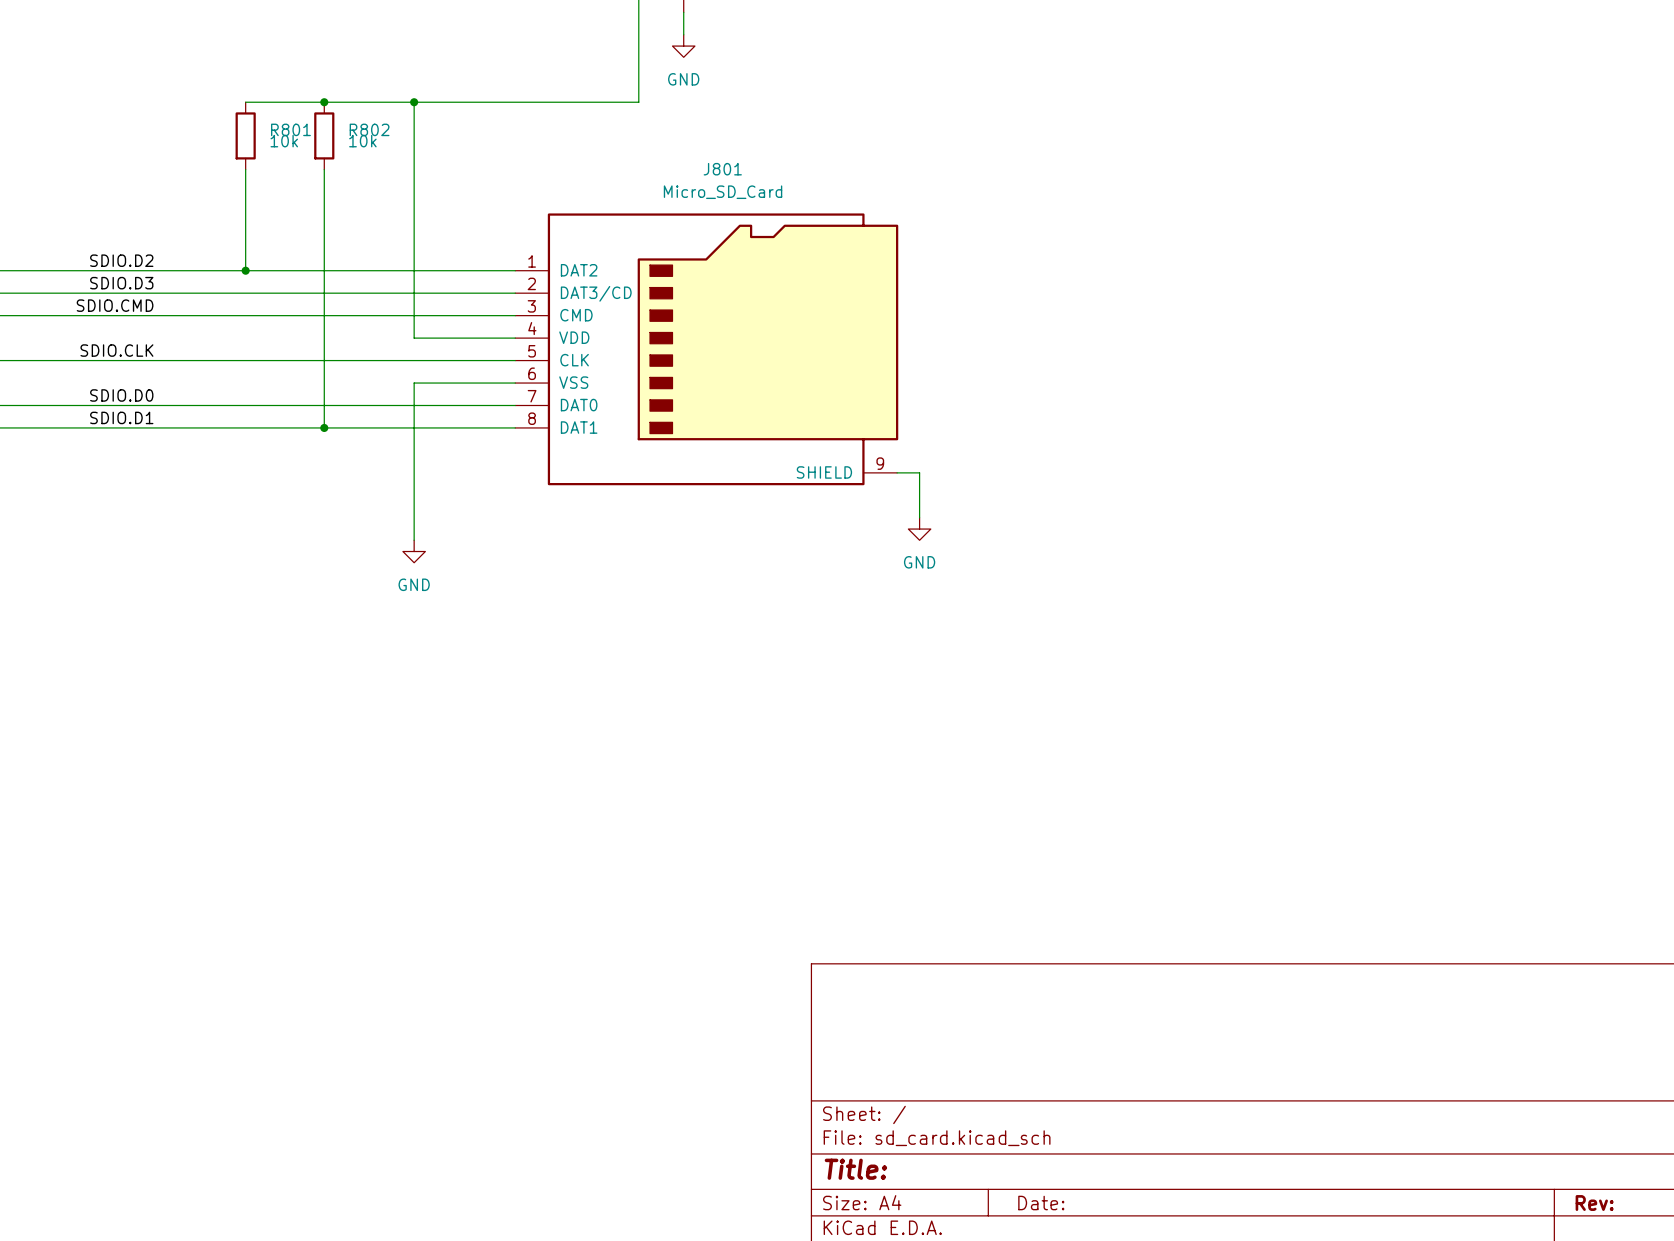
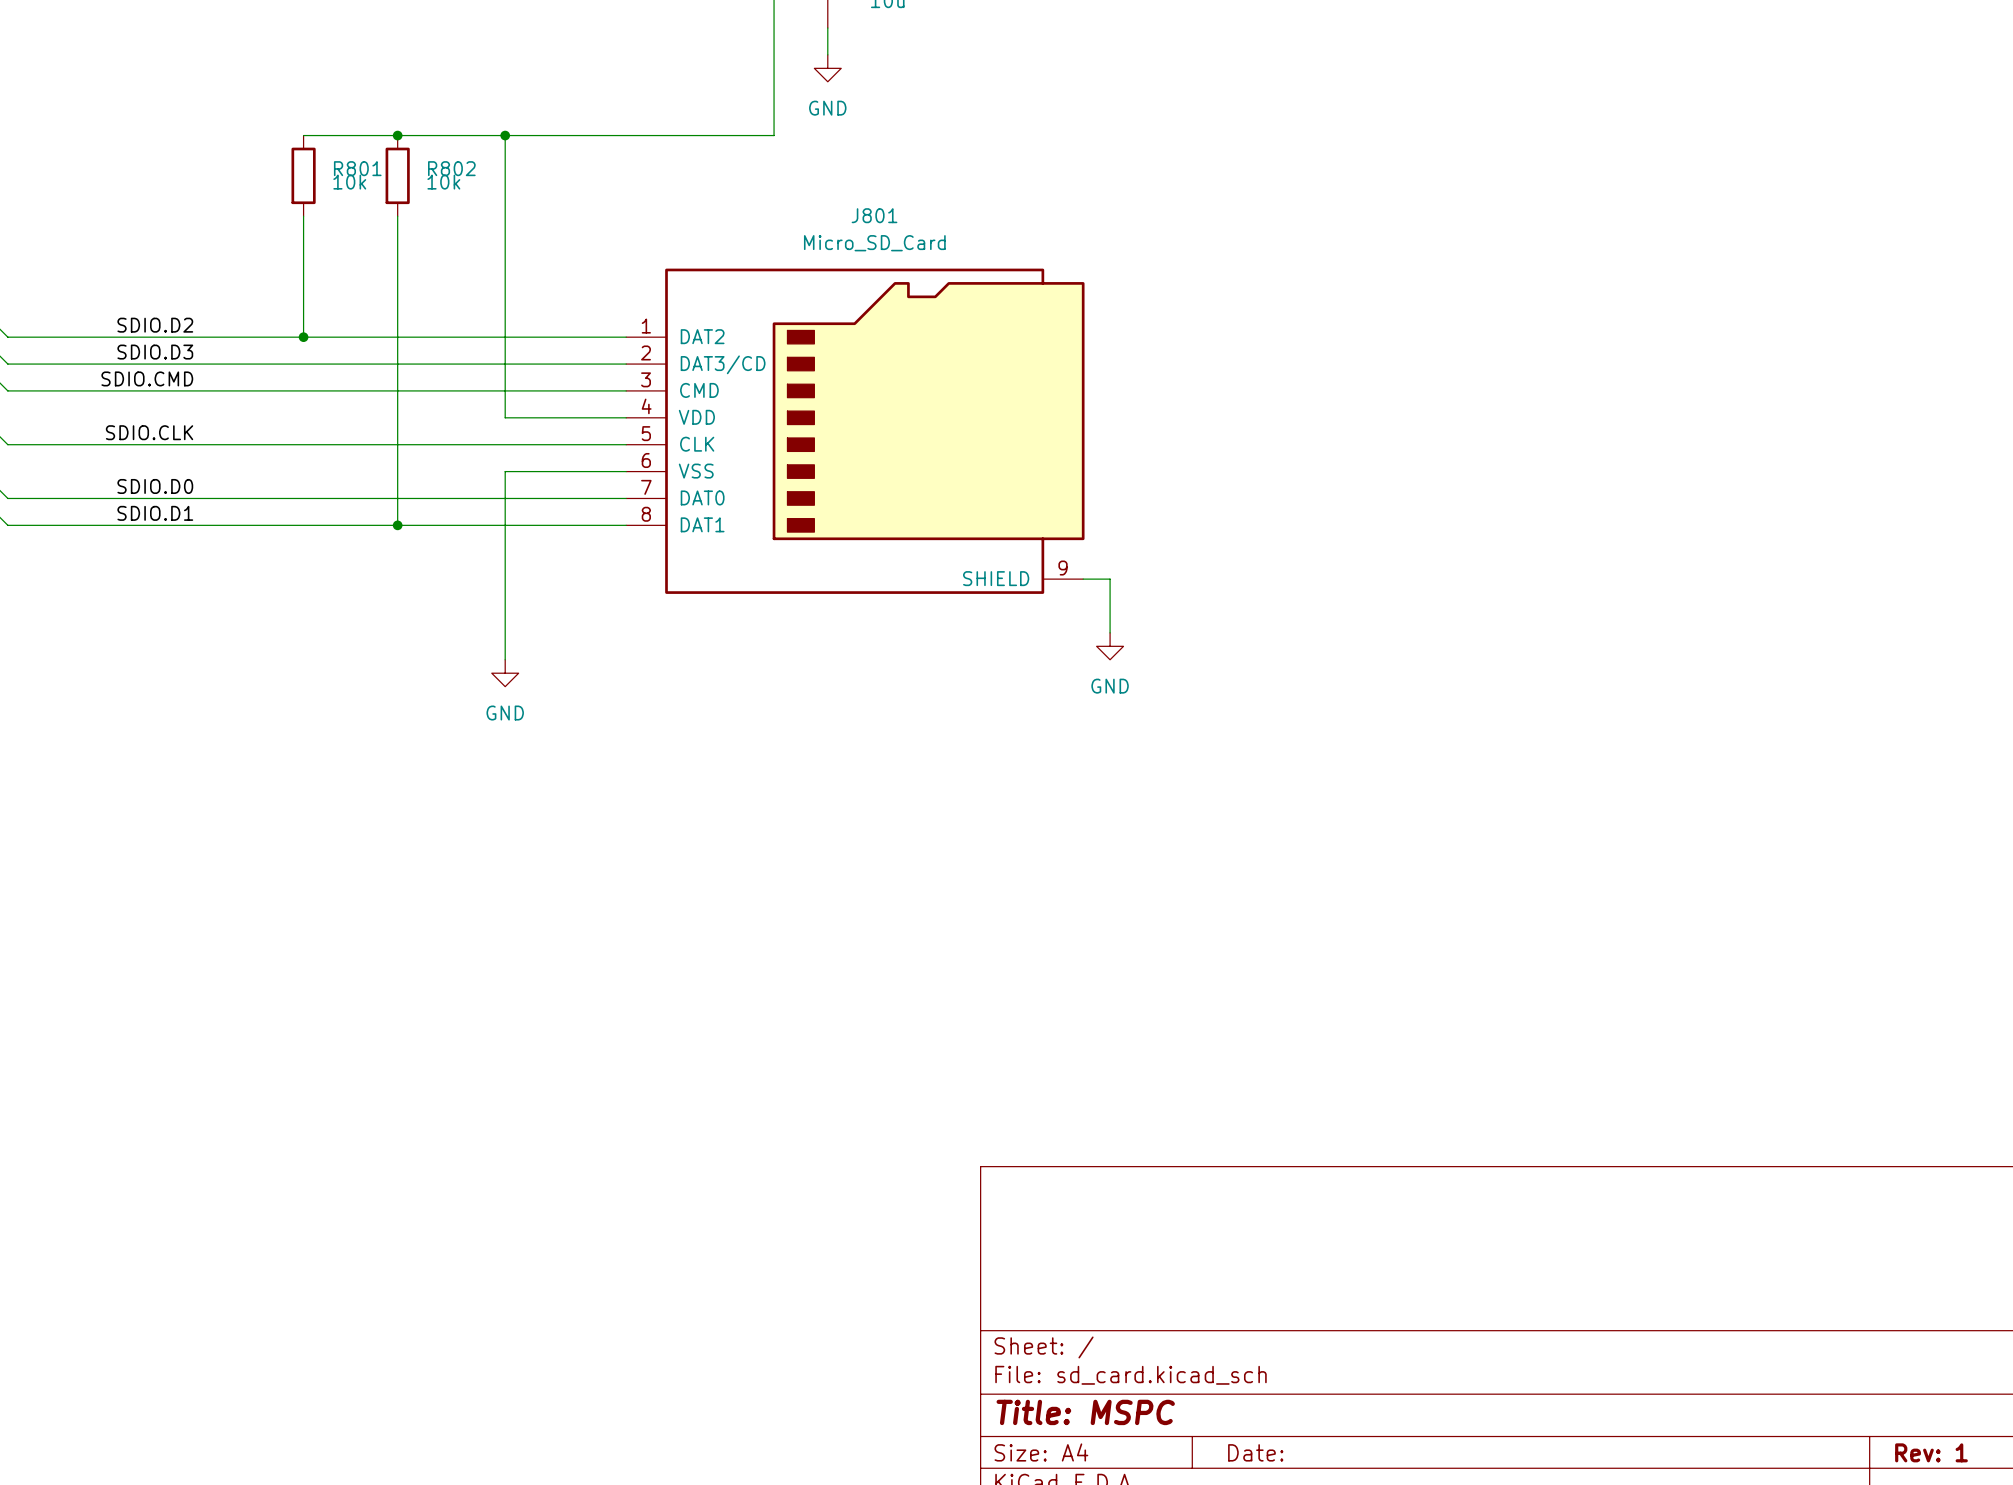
title block: Title: (855, 1169) -> Title: MSPC (1085, 1412)
title block: Rev: (1594, 1203) -> Rev: 1 (1931, 1452)

